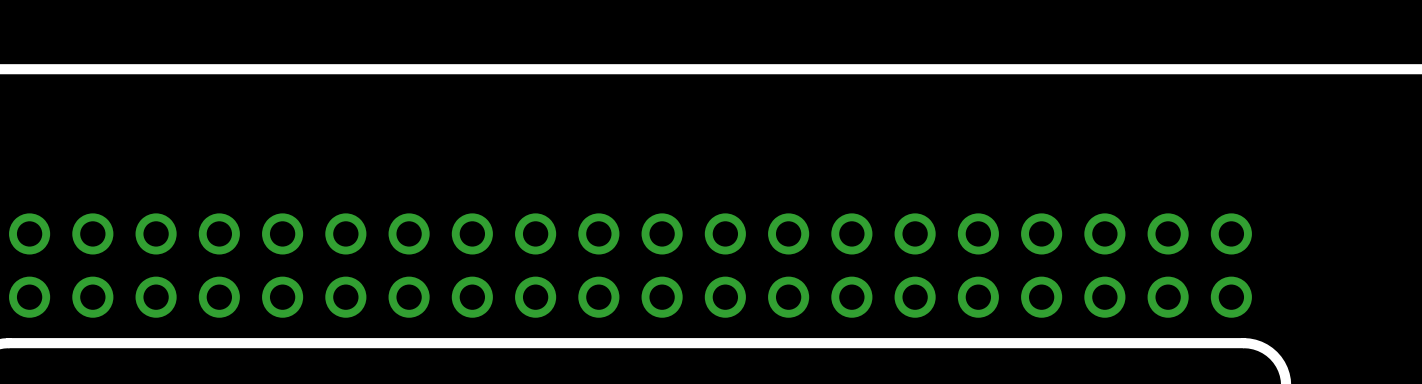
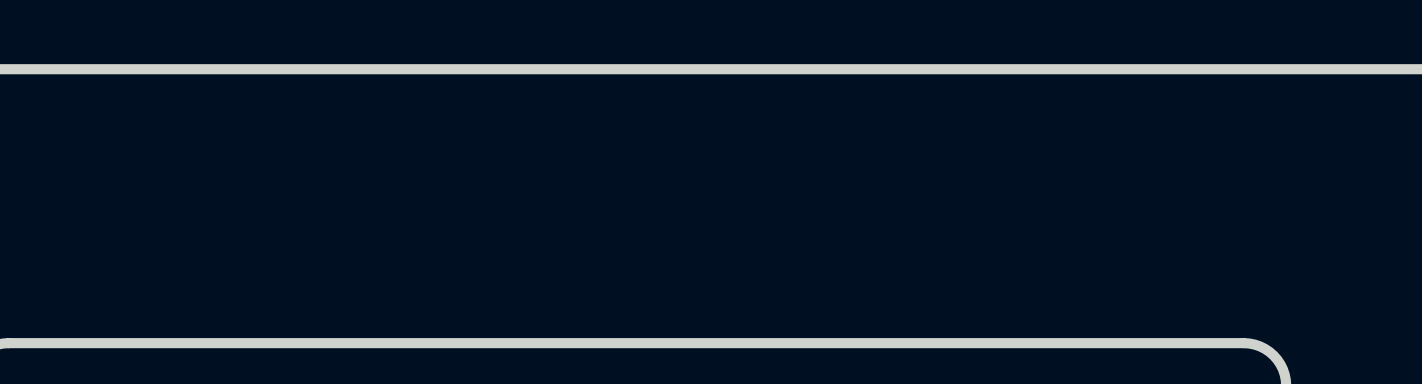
part: (630, 265) -> none

